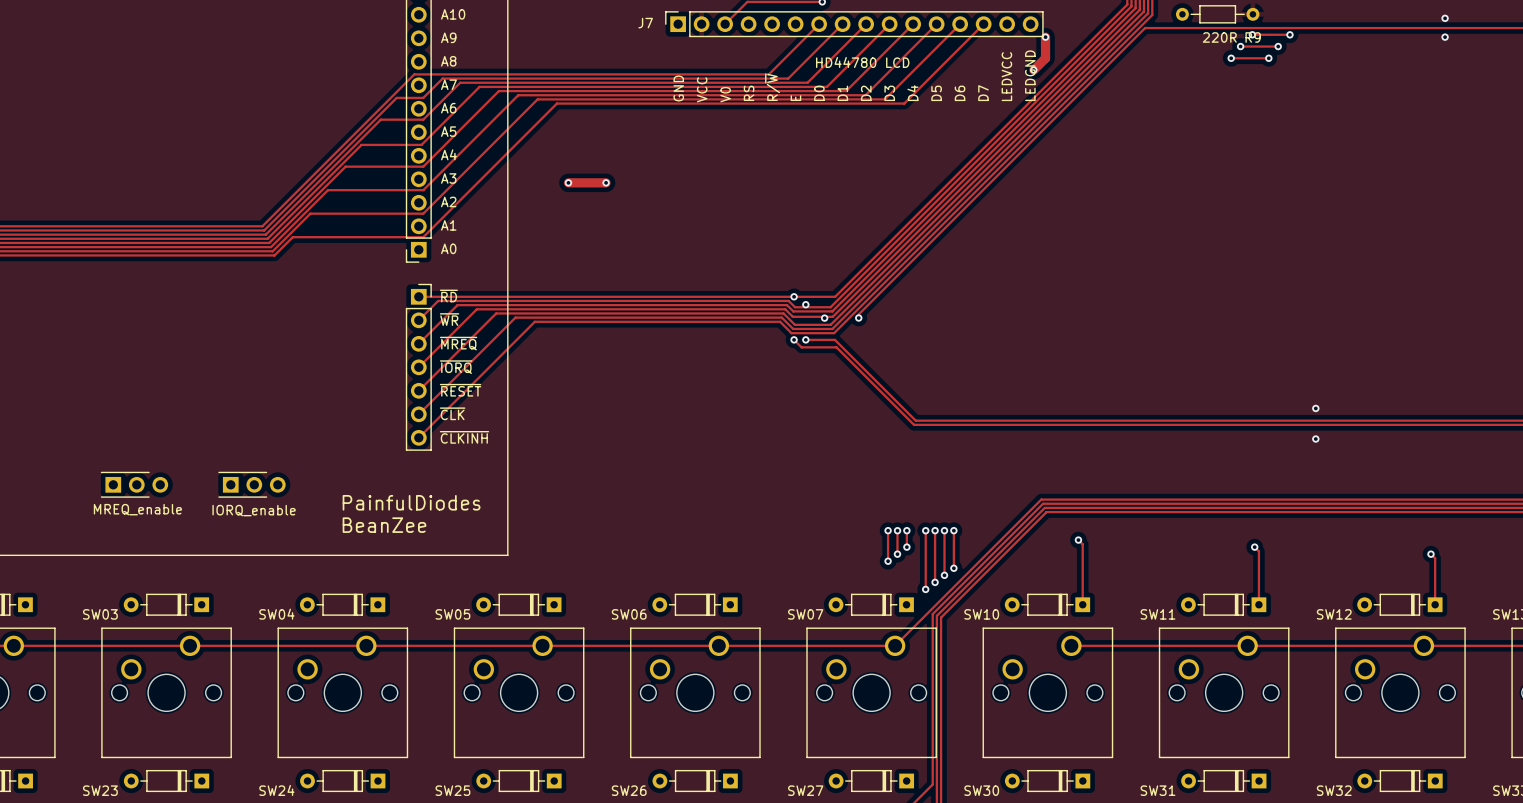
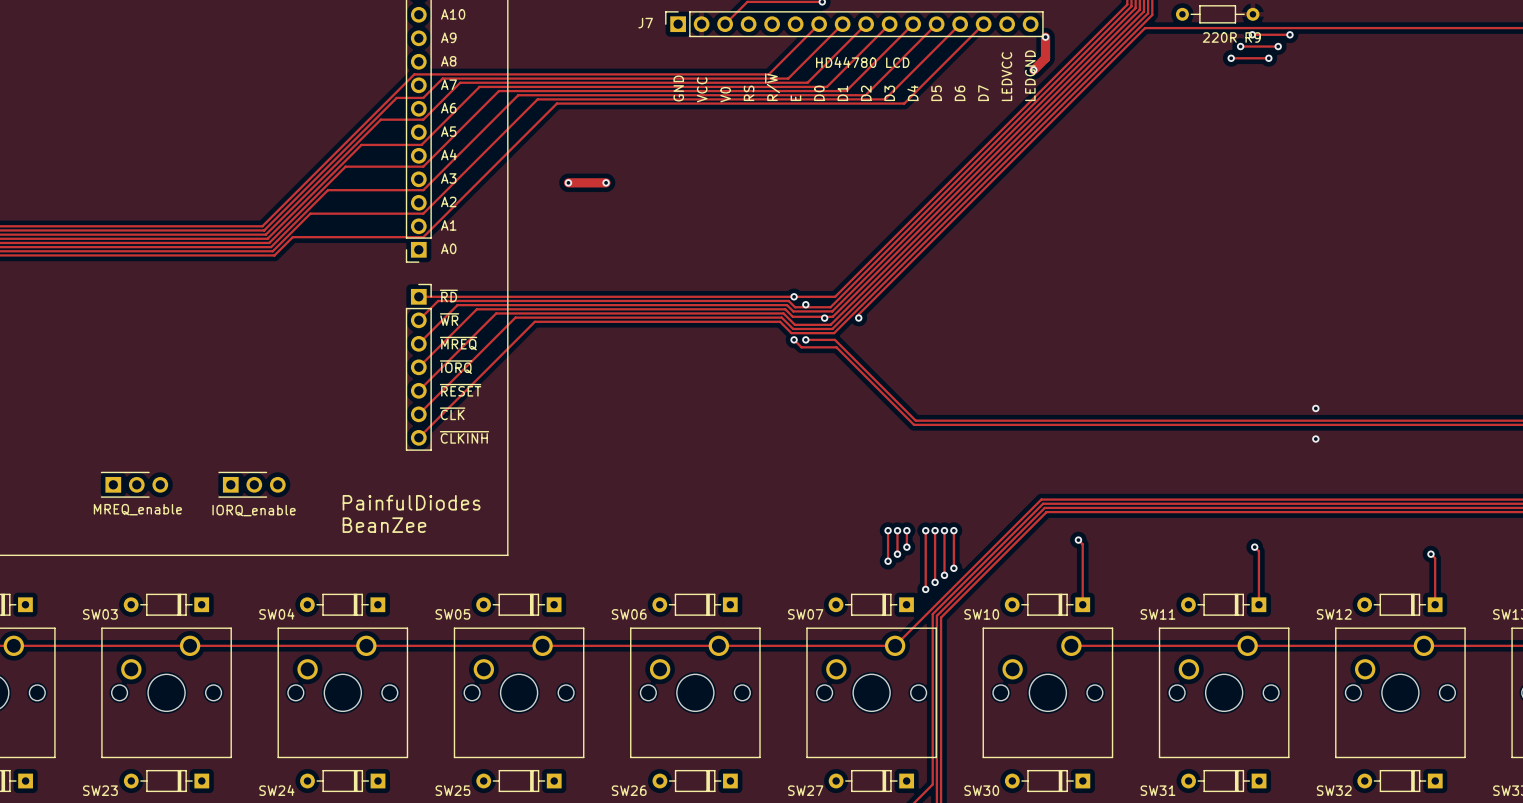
via: (1445, 18) -> none
via: (1445, 37) -> none

